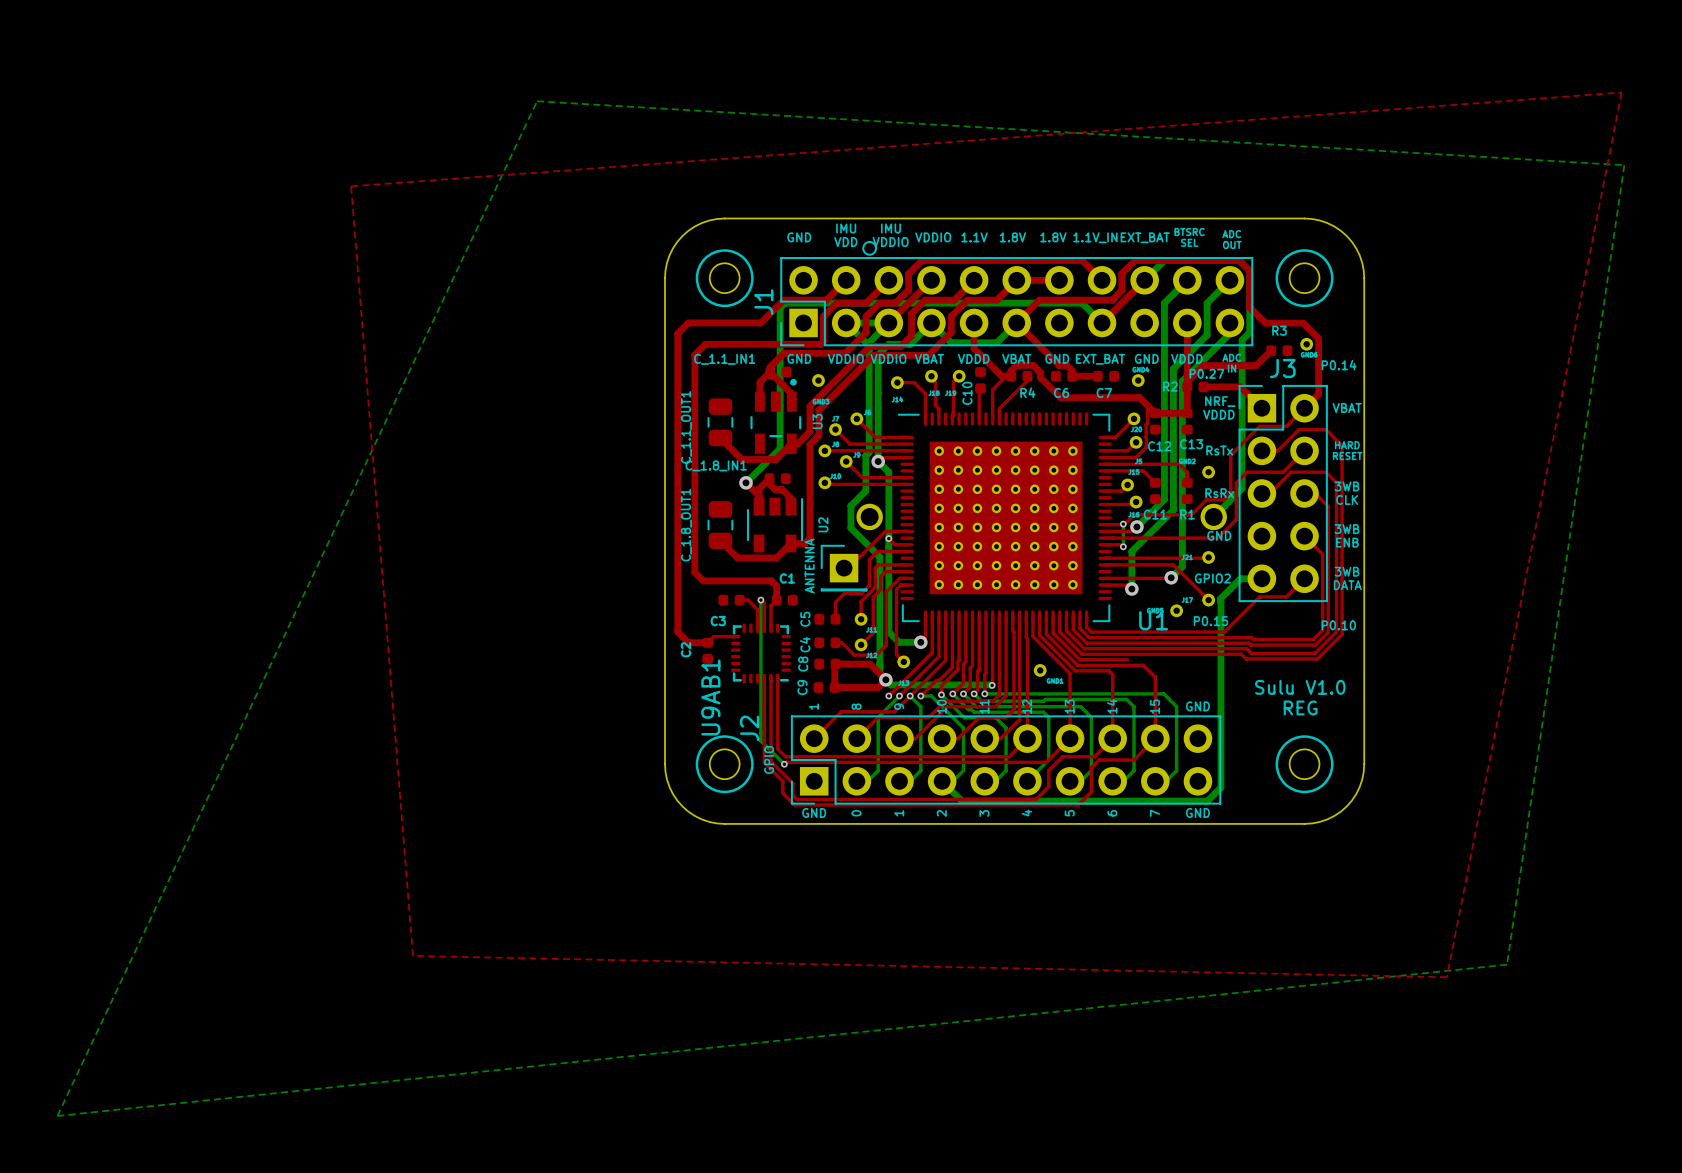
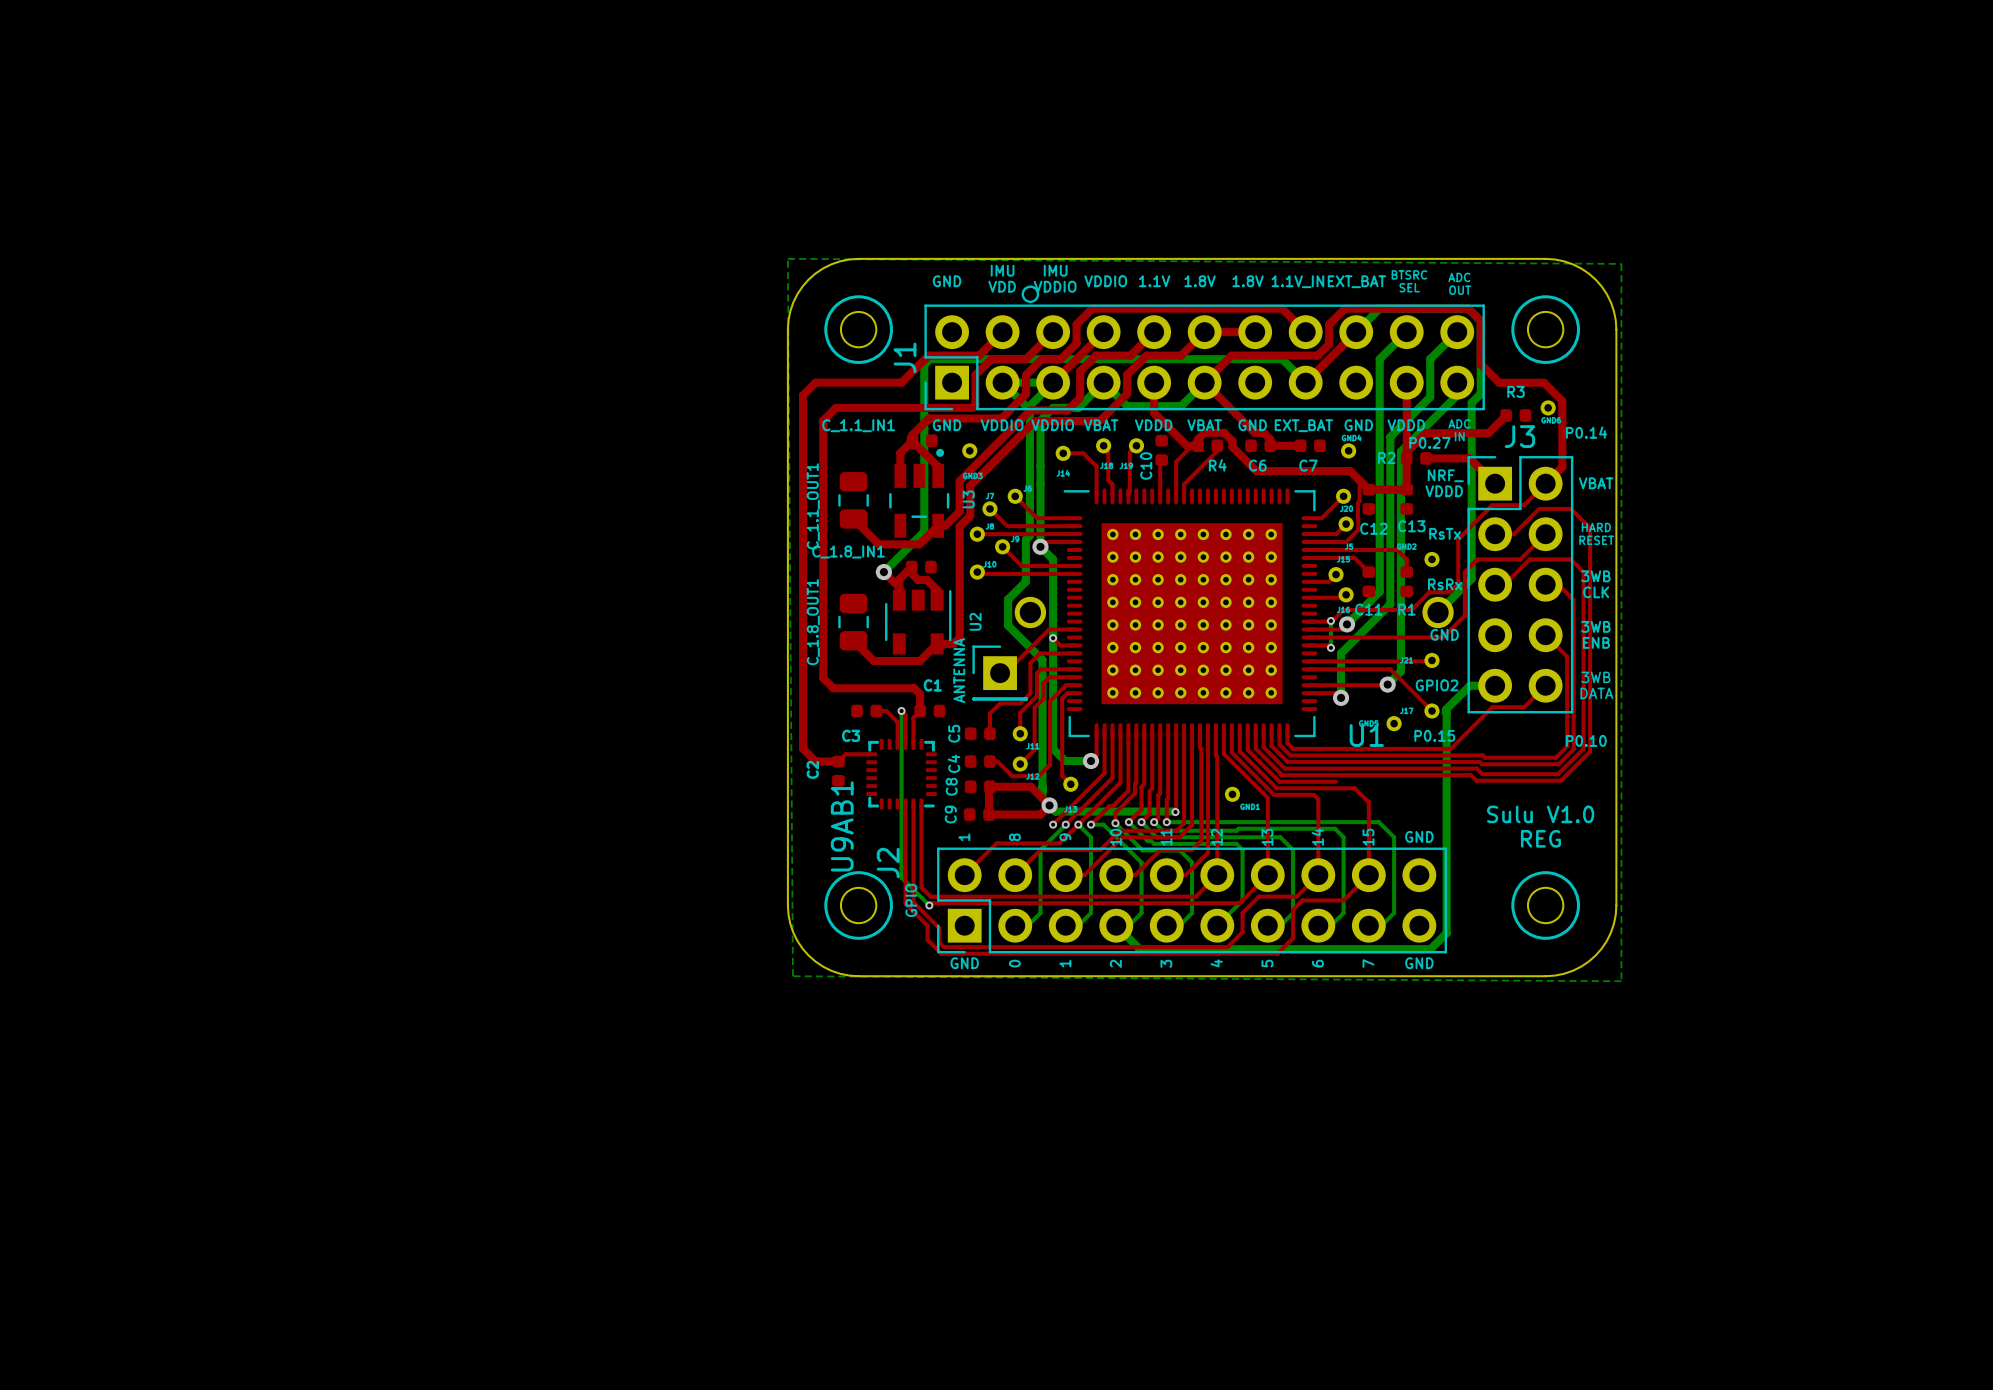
top zone outline: (1621, 92) (351, 186) (412, 955) (1446, 977) (1621, 92) -> none
bottom zone outline: (537, 101) (57, 1115) (1507, 964) (1624, 165) (537, 101) -> none
bottom zone outline: none -> (787, 258) (792, 976) (1621, 981) (1621, 263) (787, 258)

